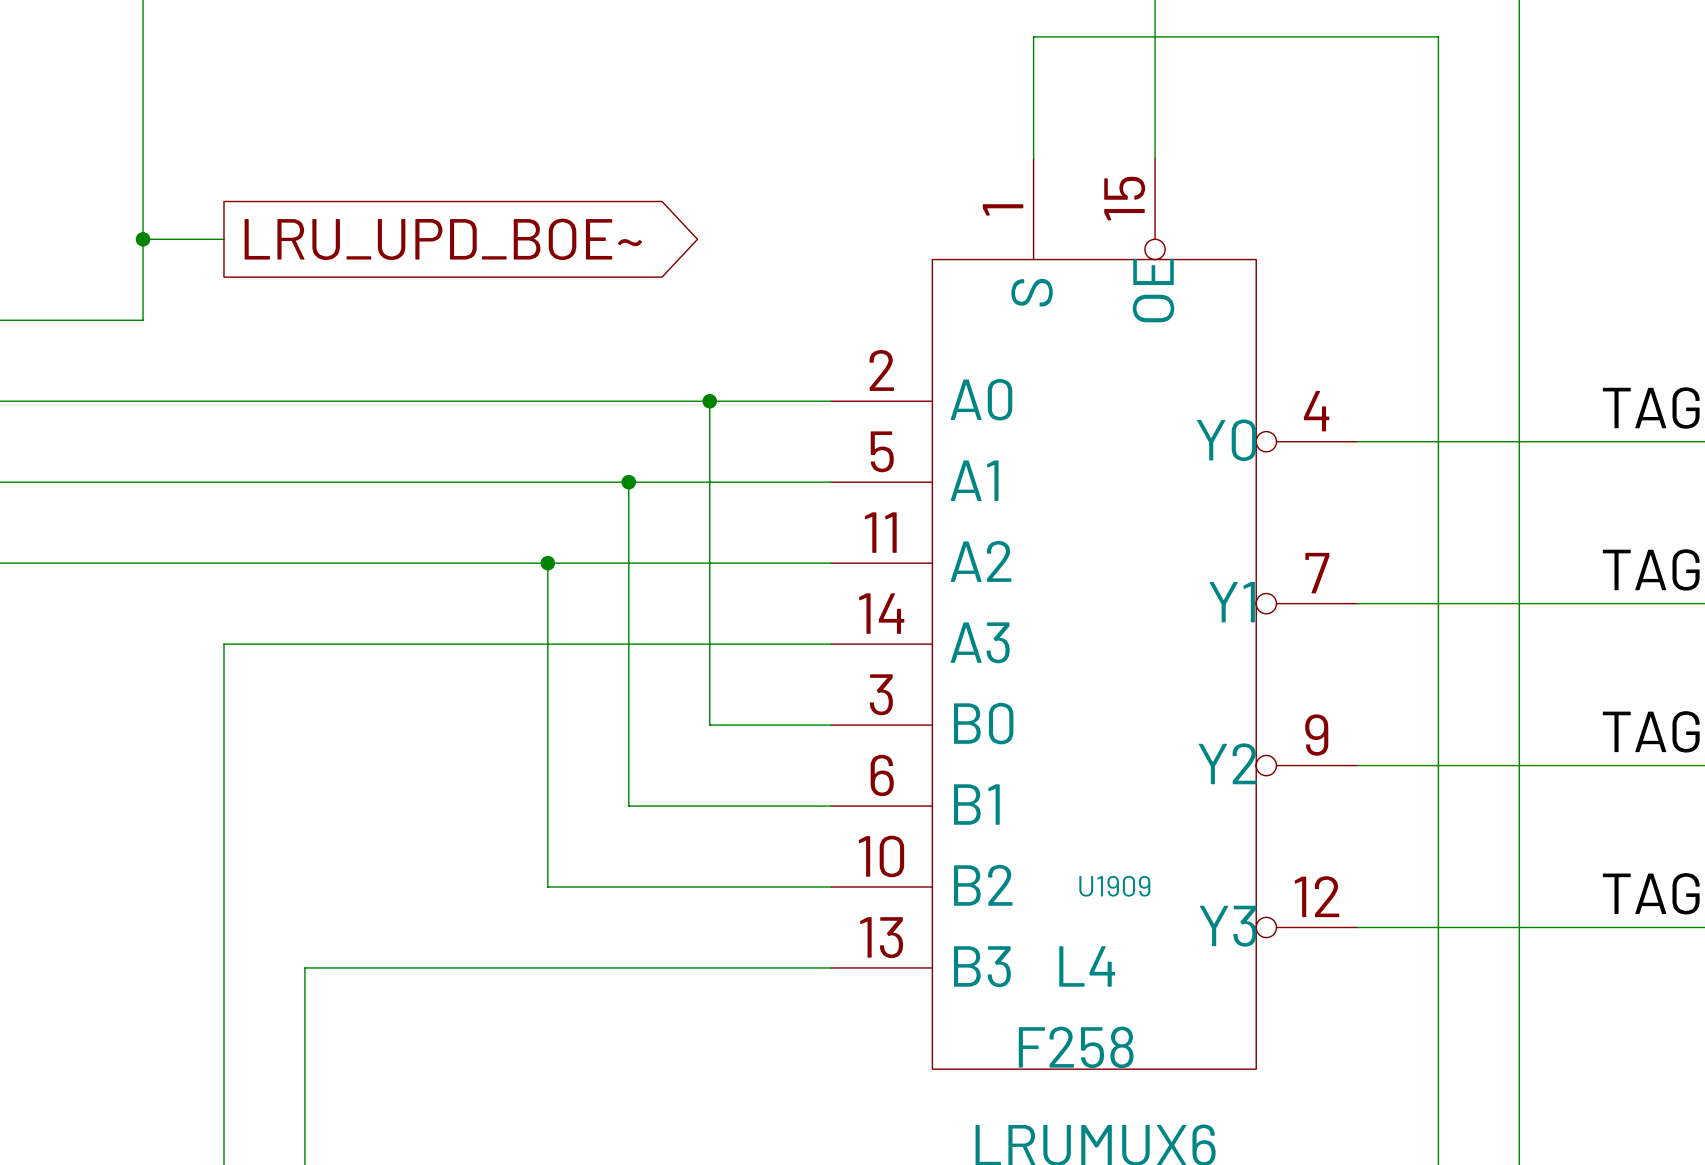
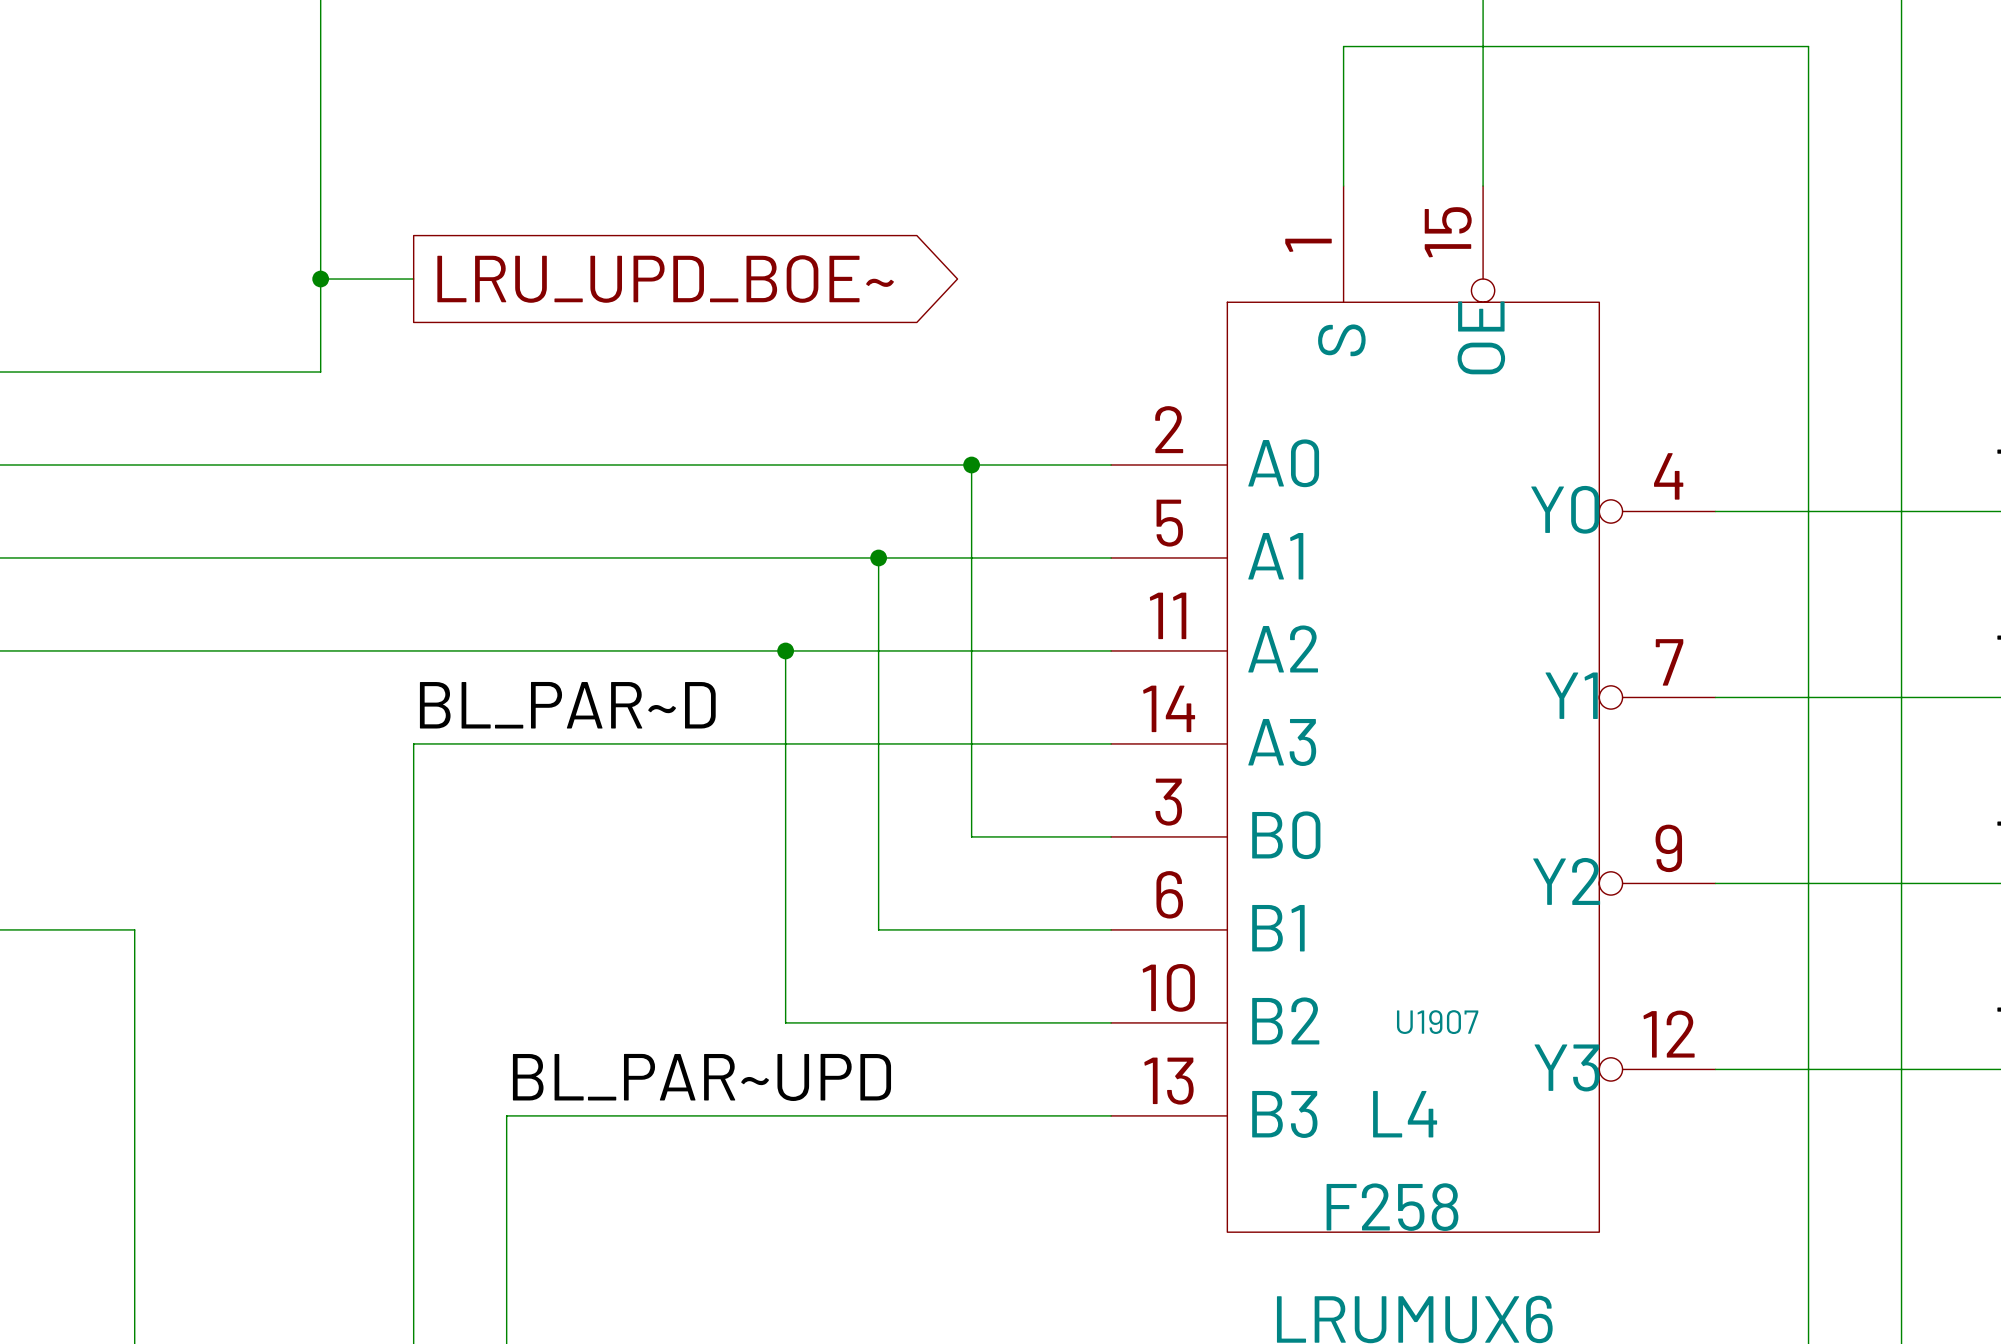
label: none -> BL_PAR~D (567, 705)
U1909 name: U1909 (1114, 886) -> U1907 (1437, 1022)
label: none -> BL_PAR~UPD (701, 1077)

